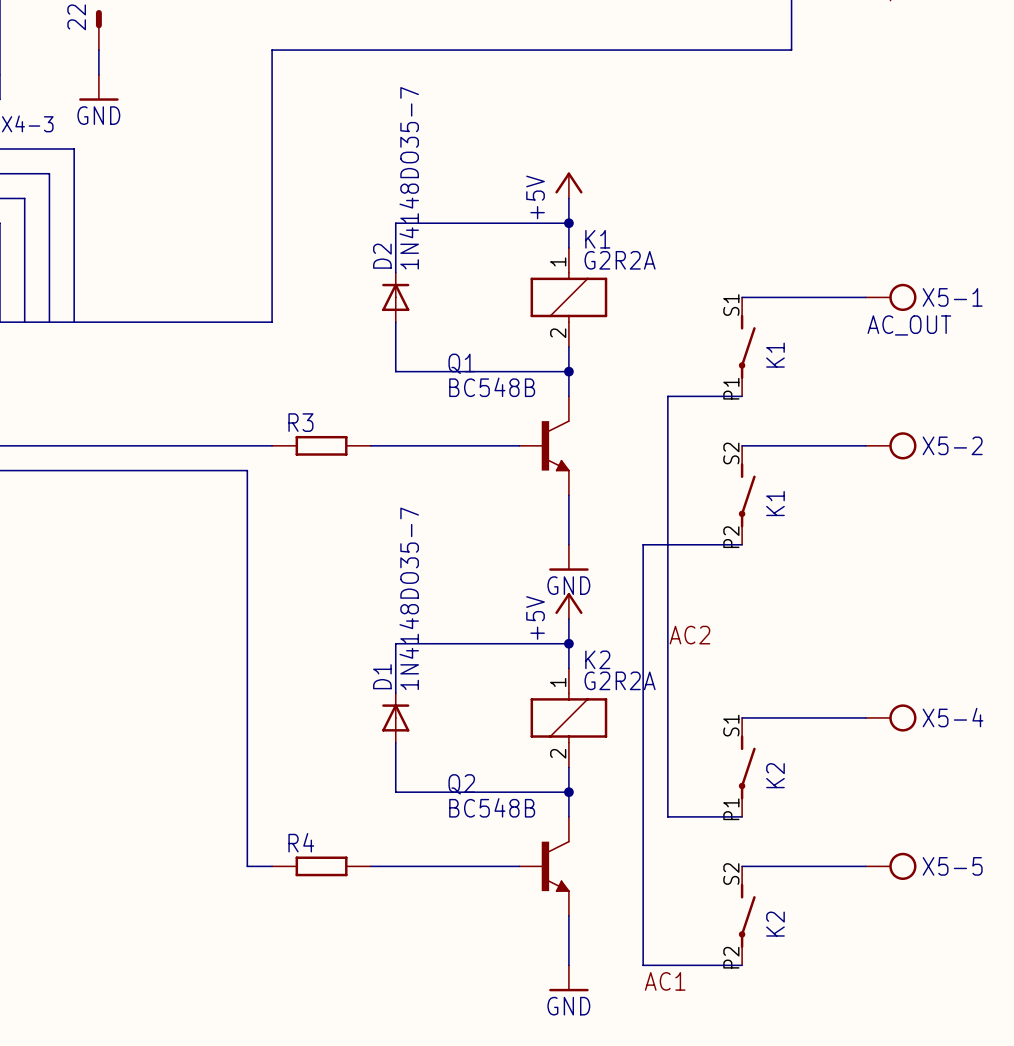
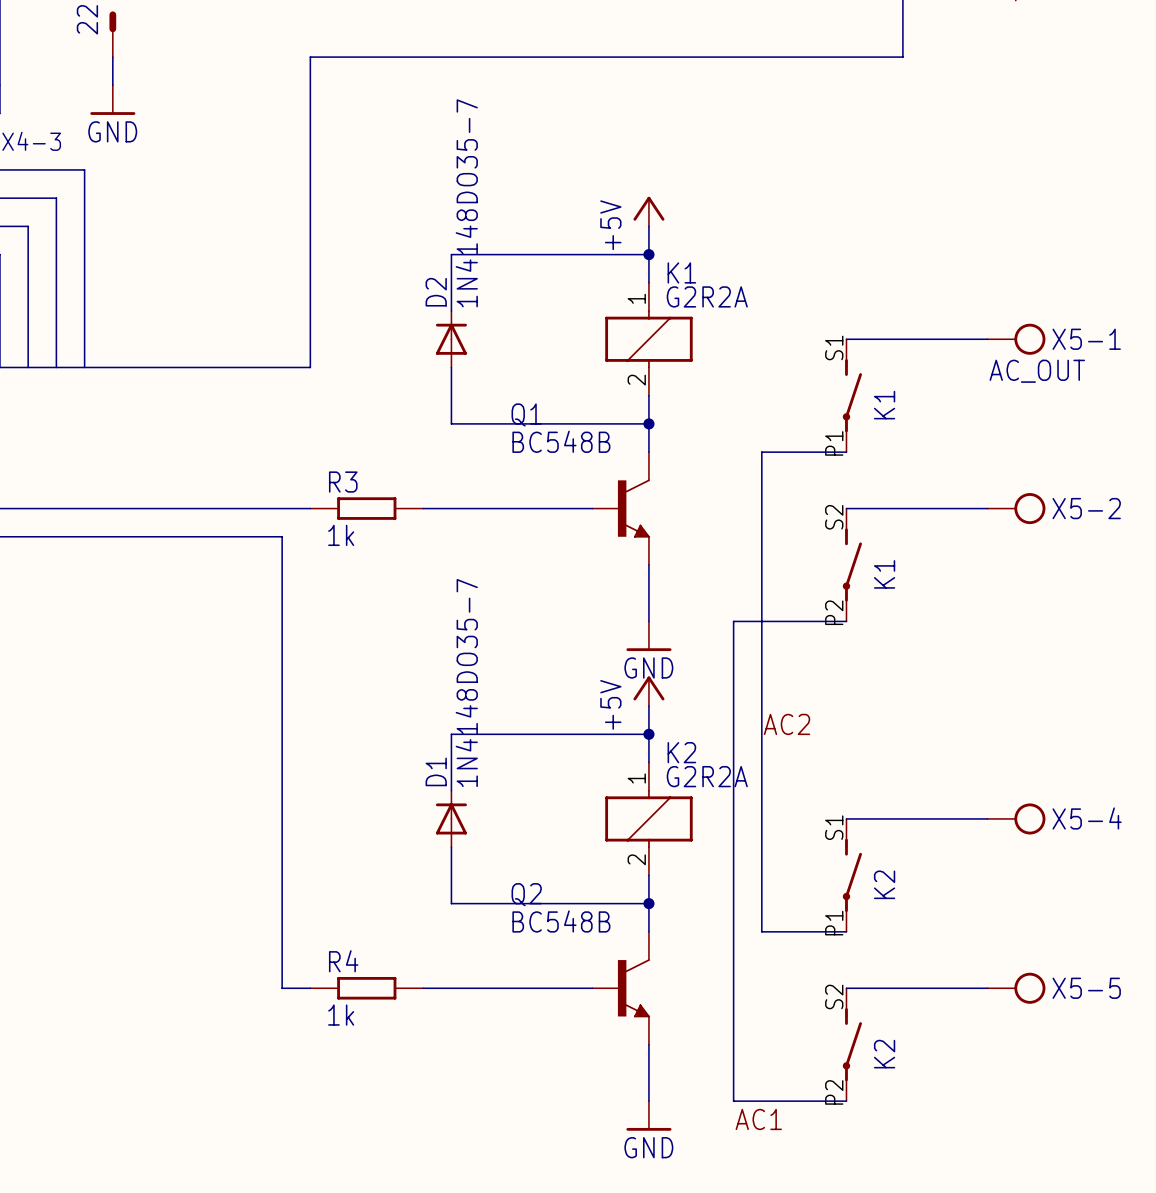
R3 value: none -> 1k (341, 535)
R4 value: none -> 1k (341, 1015)

